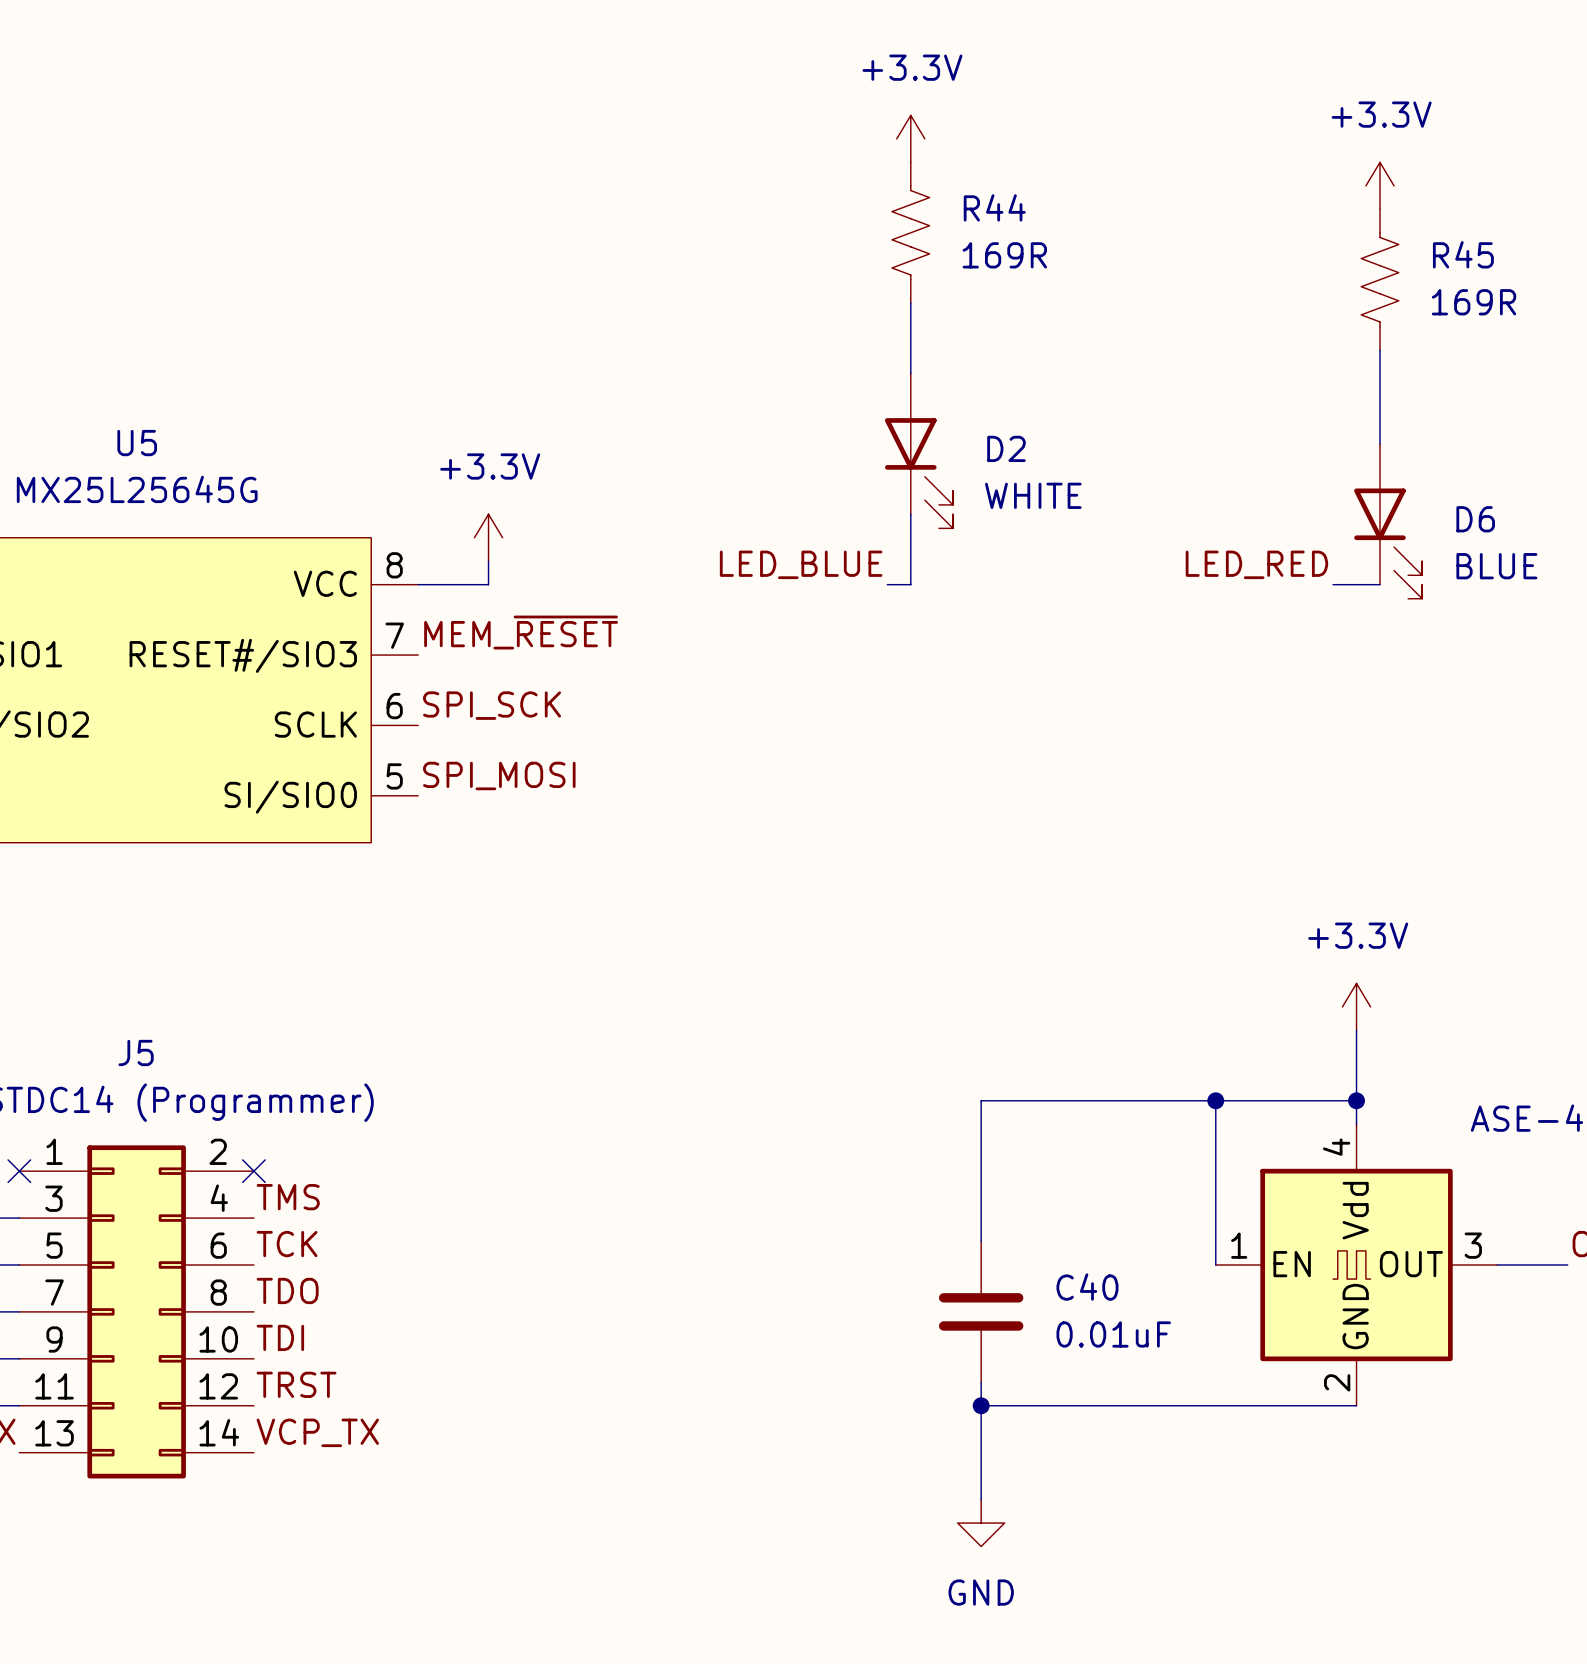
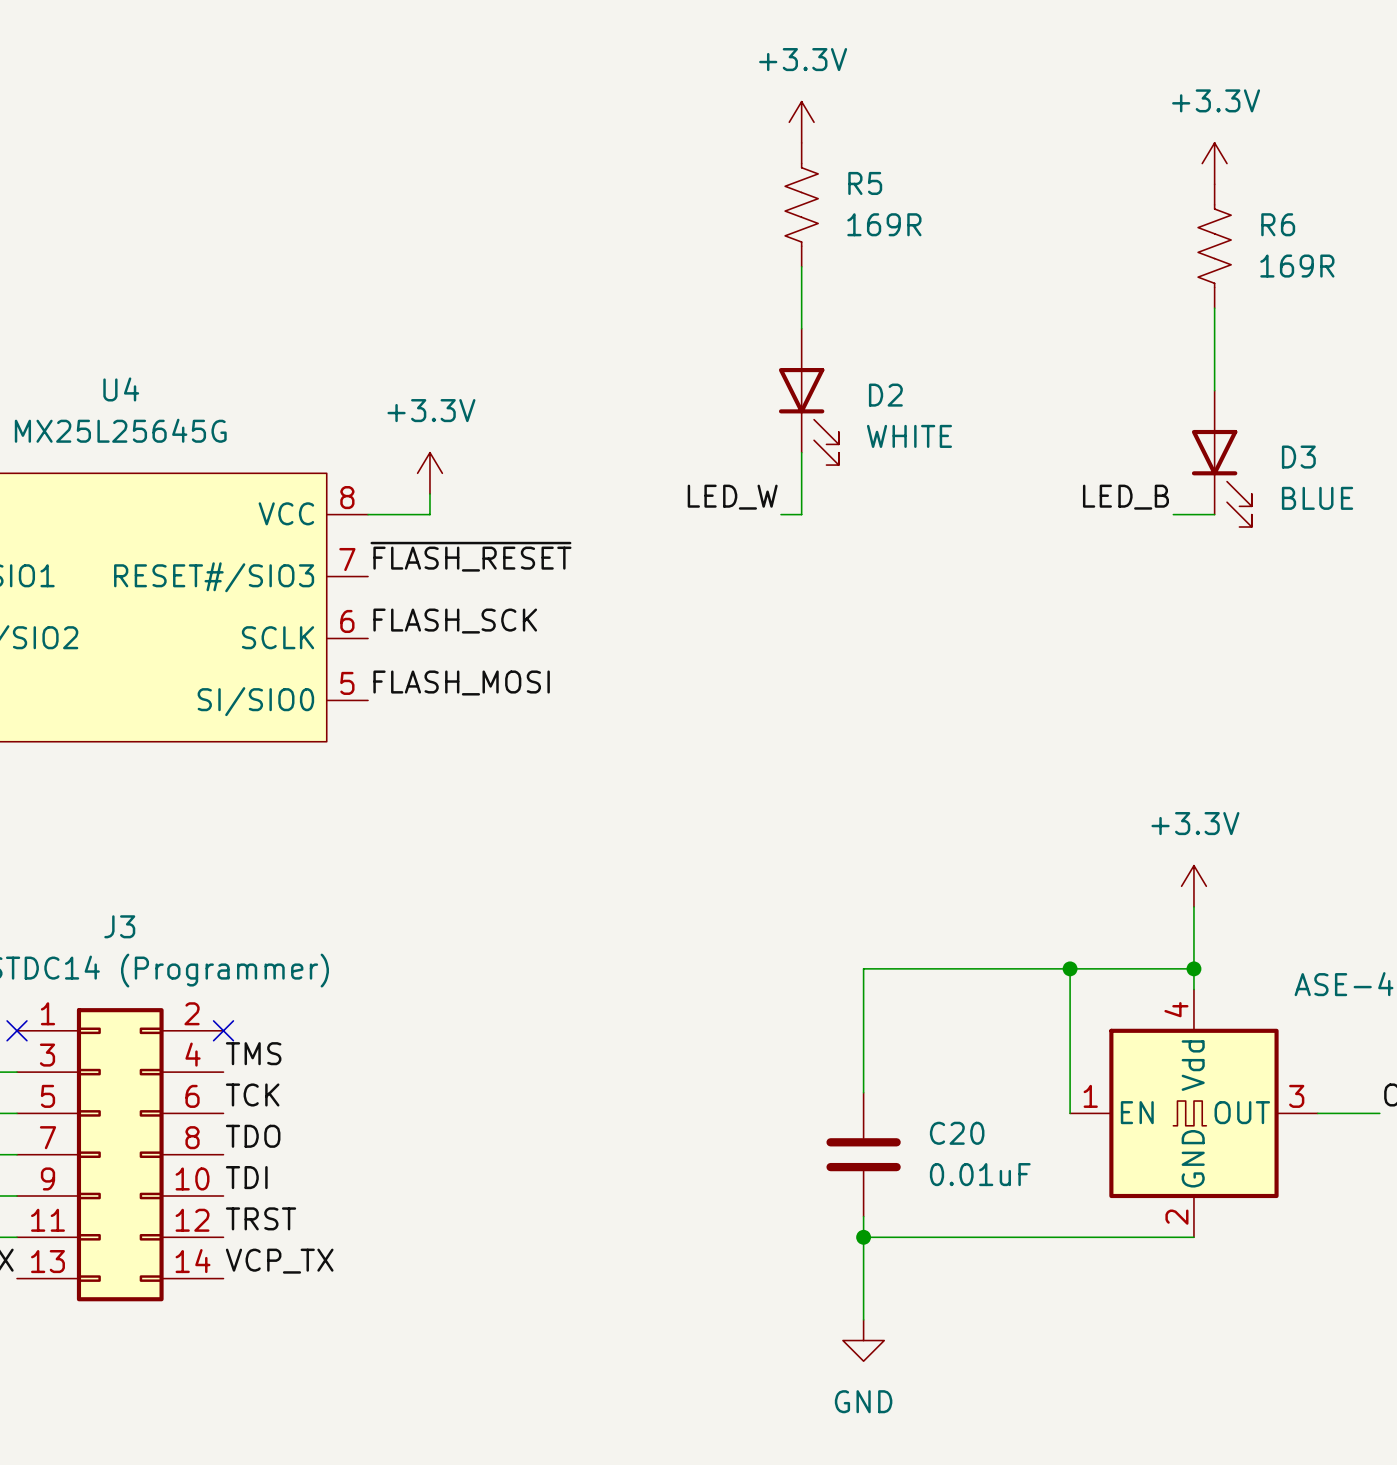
R44 name: R44 (994, 207) -> R5 (865, 183)
R45 name: R45 (1463, 254) -> R6 (1278, 224)
U5 name: U5 (137, 443) -> U4 (121, 389)
D6 name: D6 (1475, 519) -> D3 (1298, 457)
label: LED_BLUE (801, 564) -> LED_W (732, 497)
label: LED_RED (1256, 564) -> LED_B (1125, 497)
label: MEM_~{RESET} (521, 632) -> ~{FLASH_RESET} (470, 556)
label: SPI_SCK (492, 705) -> FLASH_SCK (455, 621)
label: SPI_MOSI (499, 775) -> FLASH_MOSI (461, 683)
J5 name: J5 (136, 1052) -> J3 (119, 926)
C40 name: C40 (1087, 1287) -> C20 (957, 1133)

